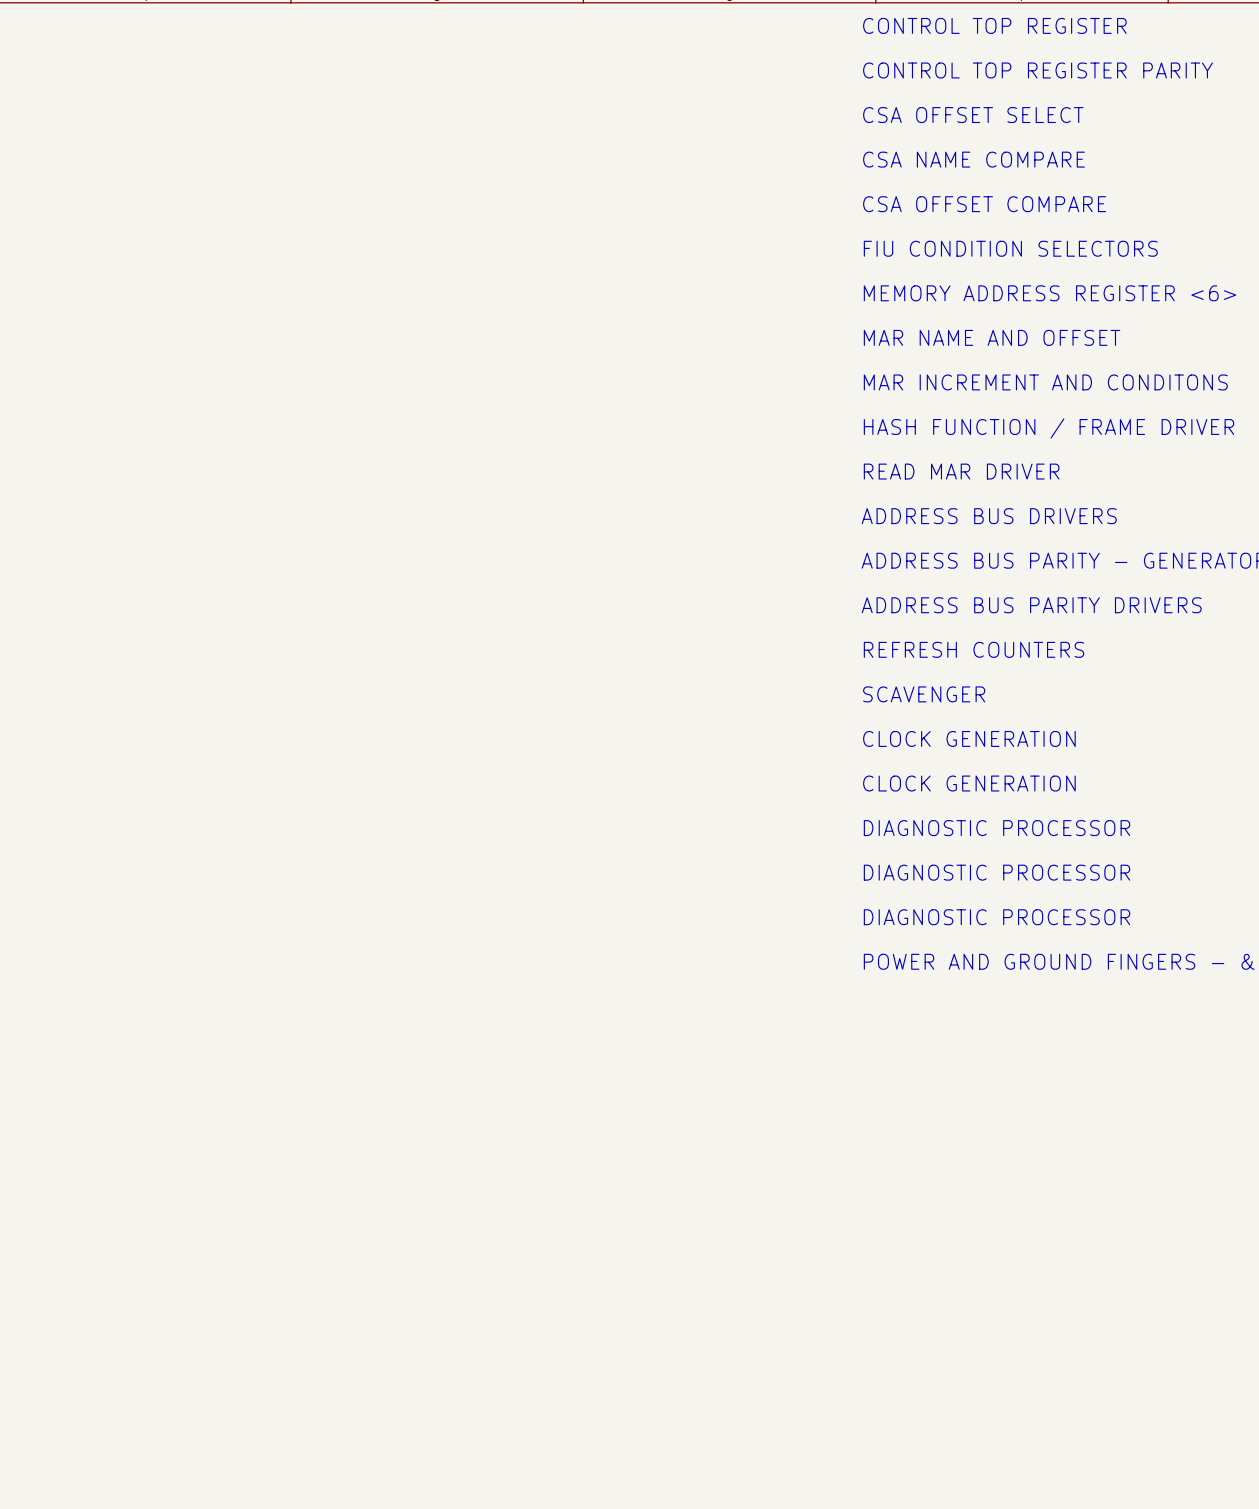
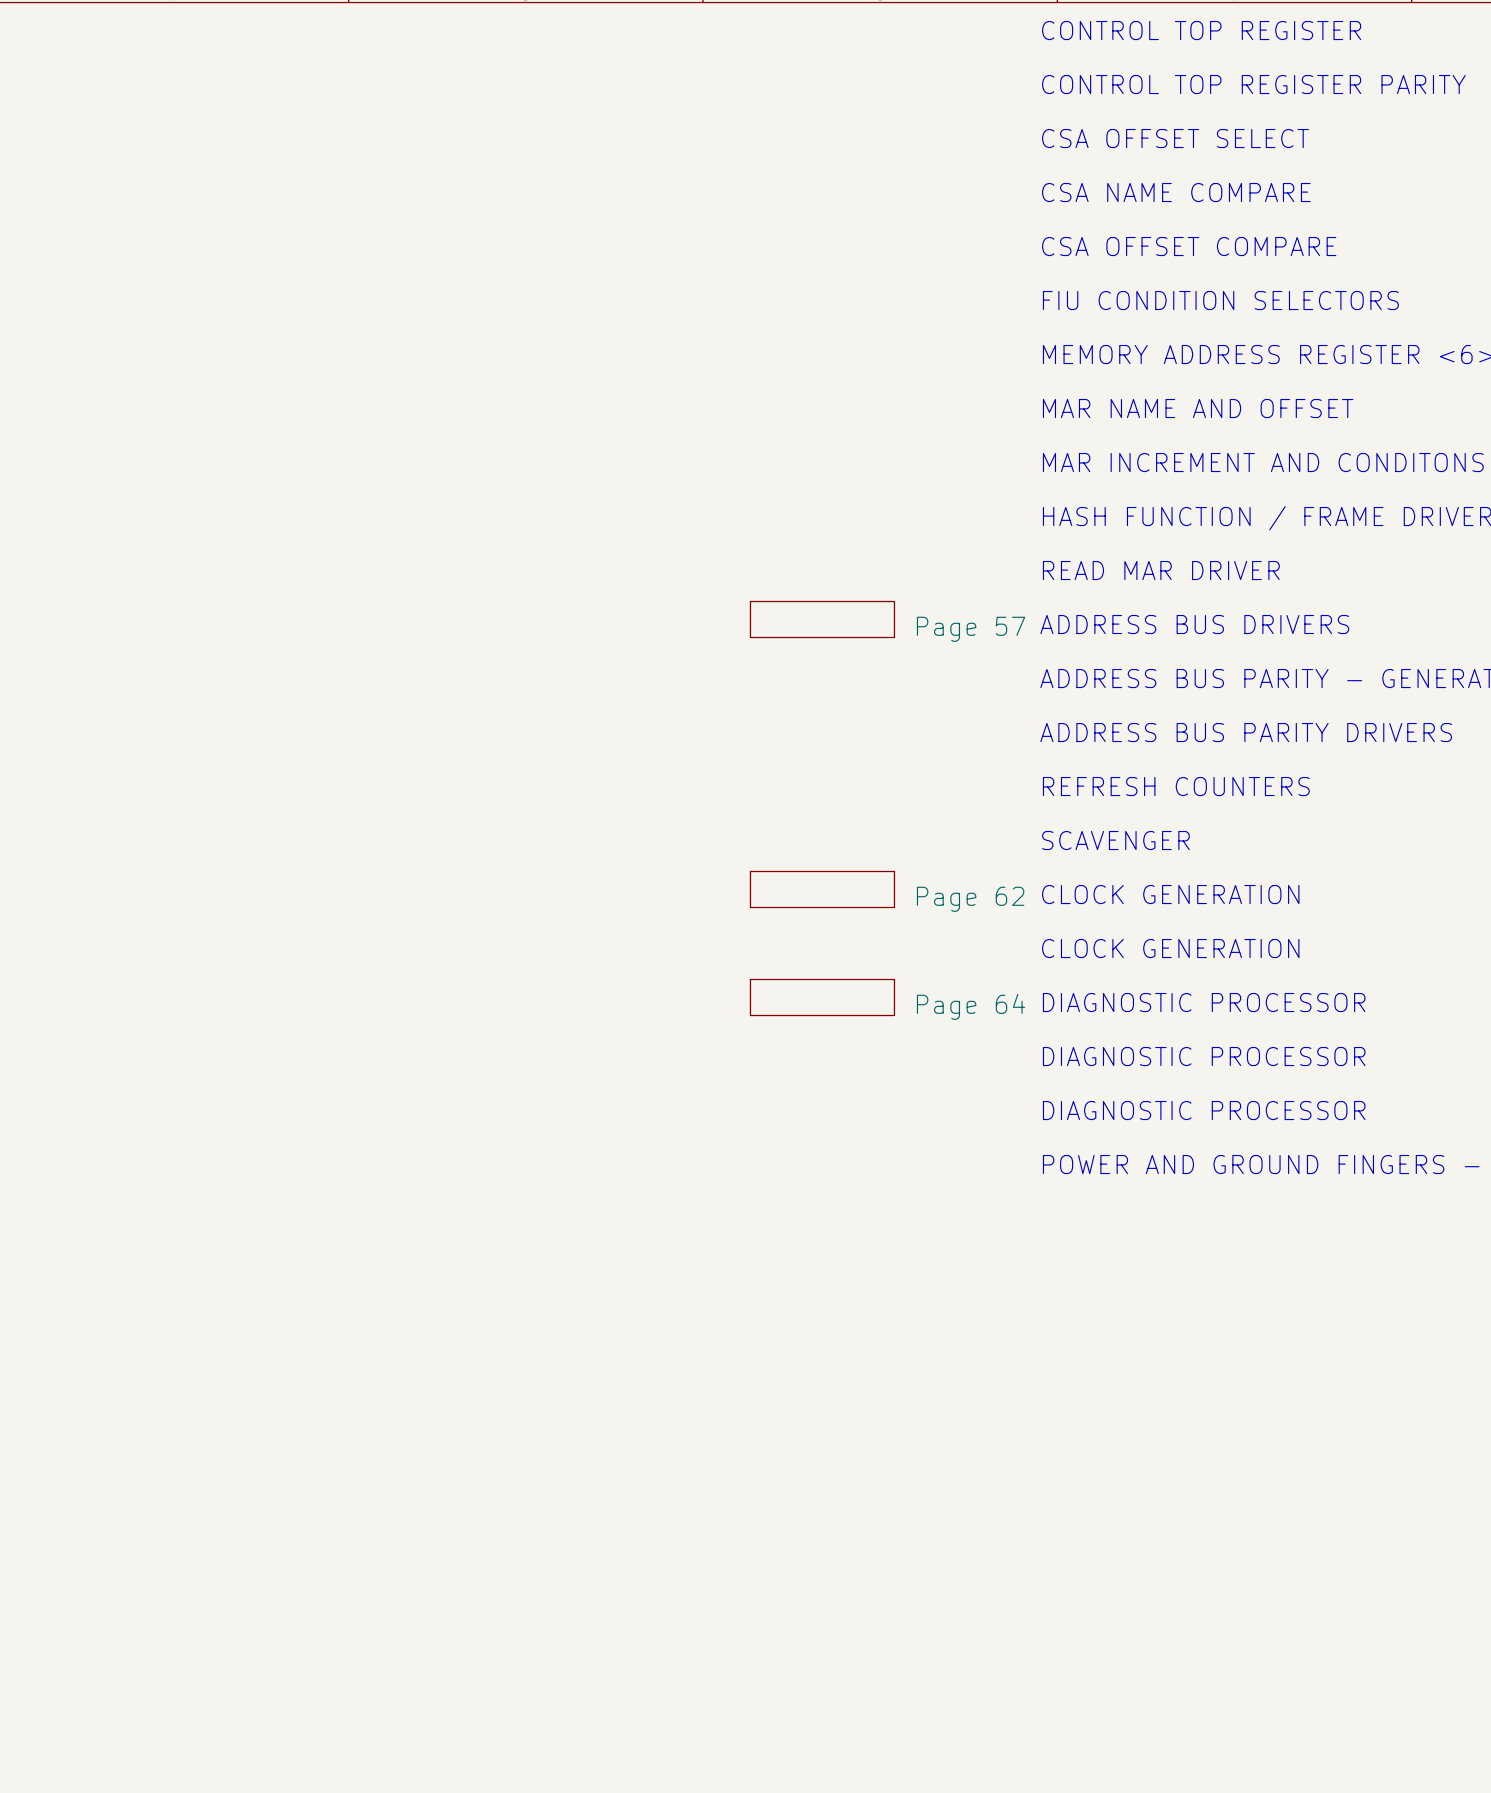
sheet Page 57: none -> (822, 619)
sheet Page 62: none -> (822, 889)
sheet Page 64: none -> (822, 997)

